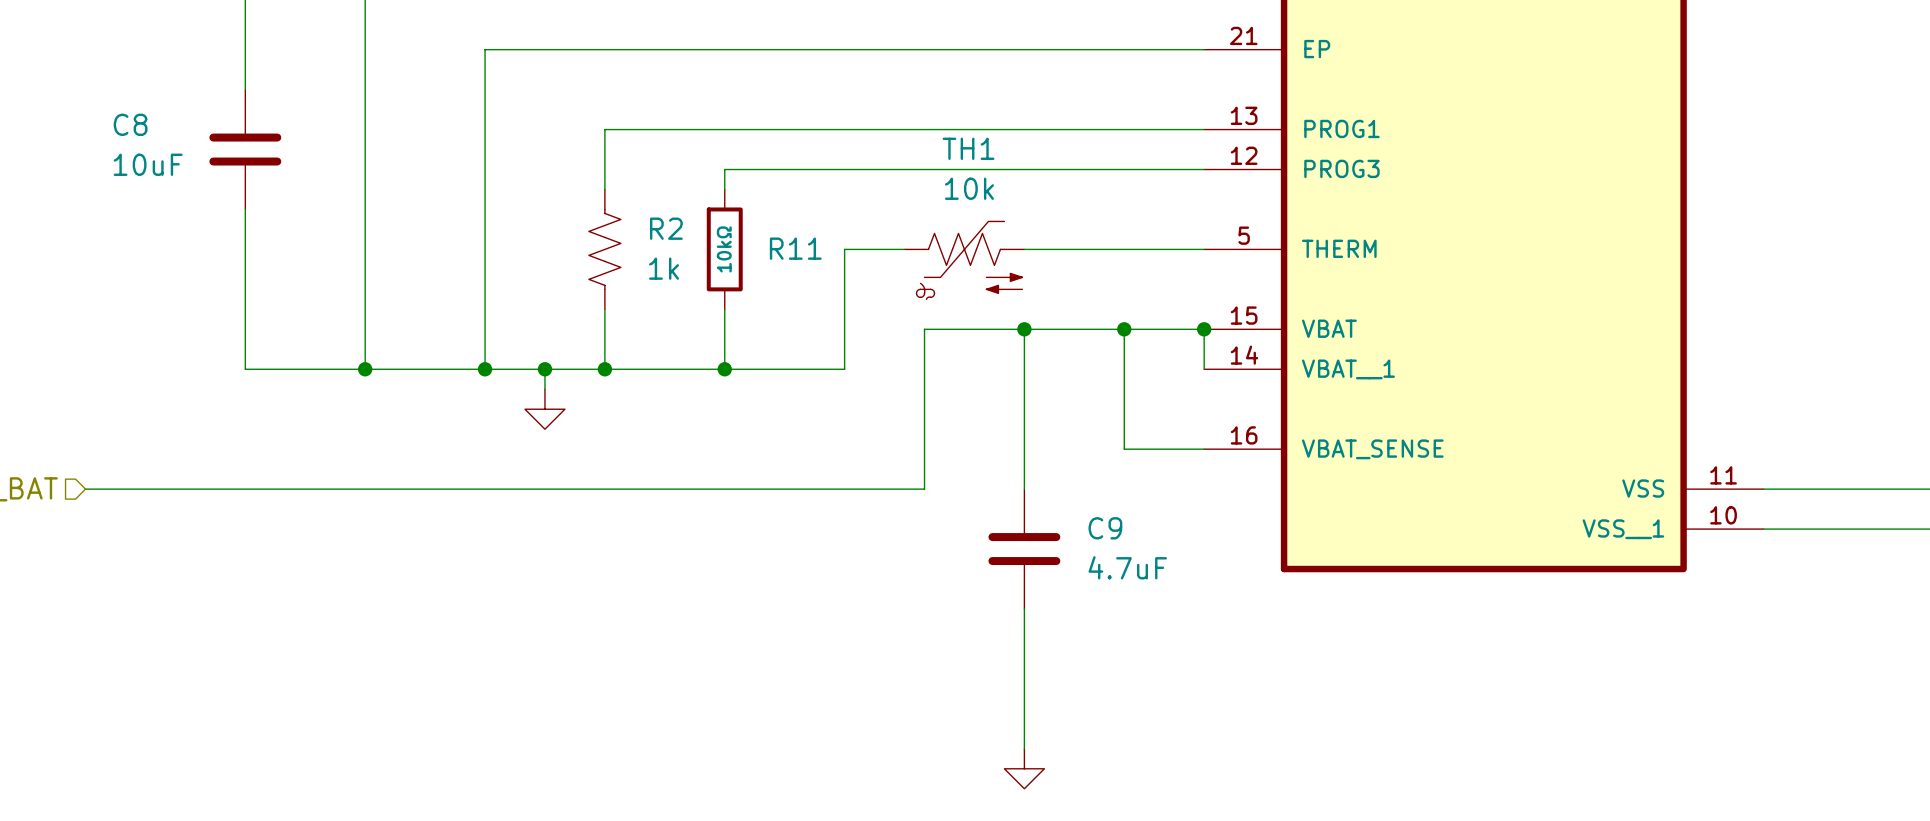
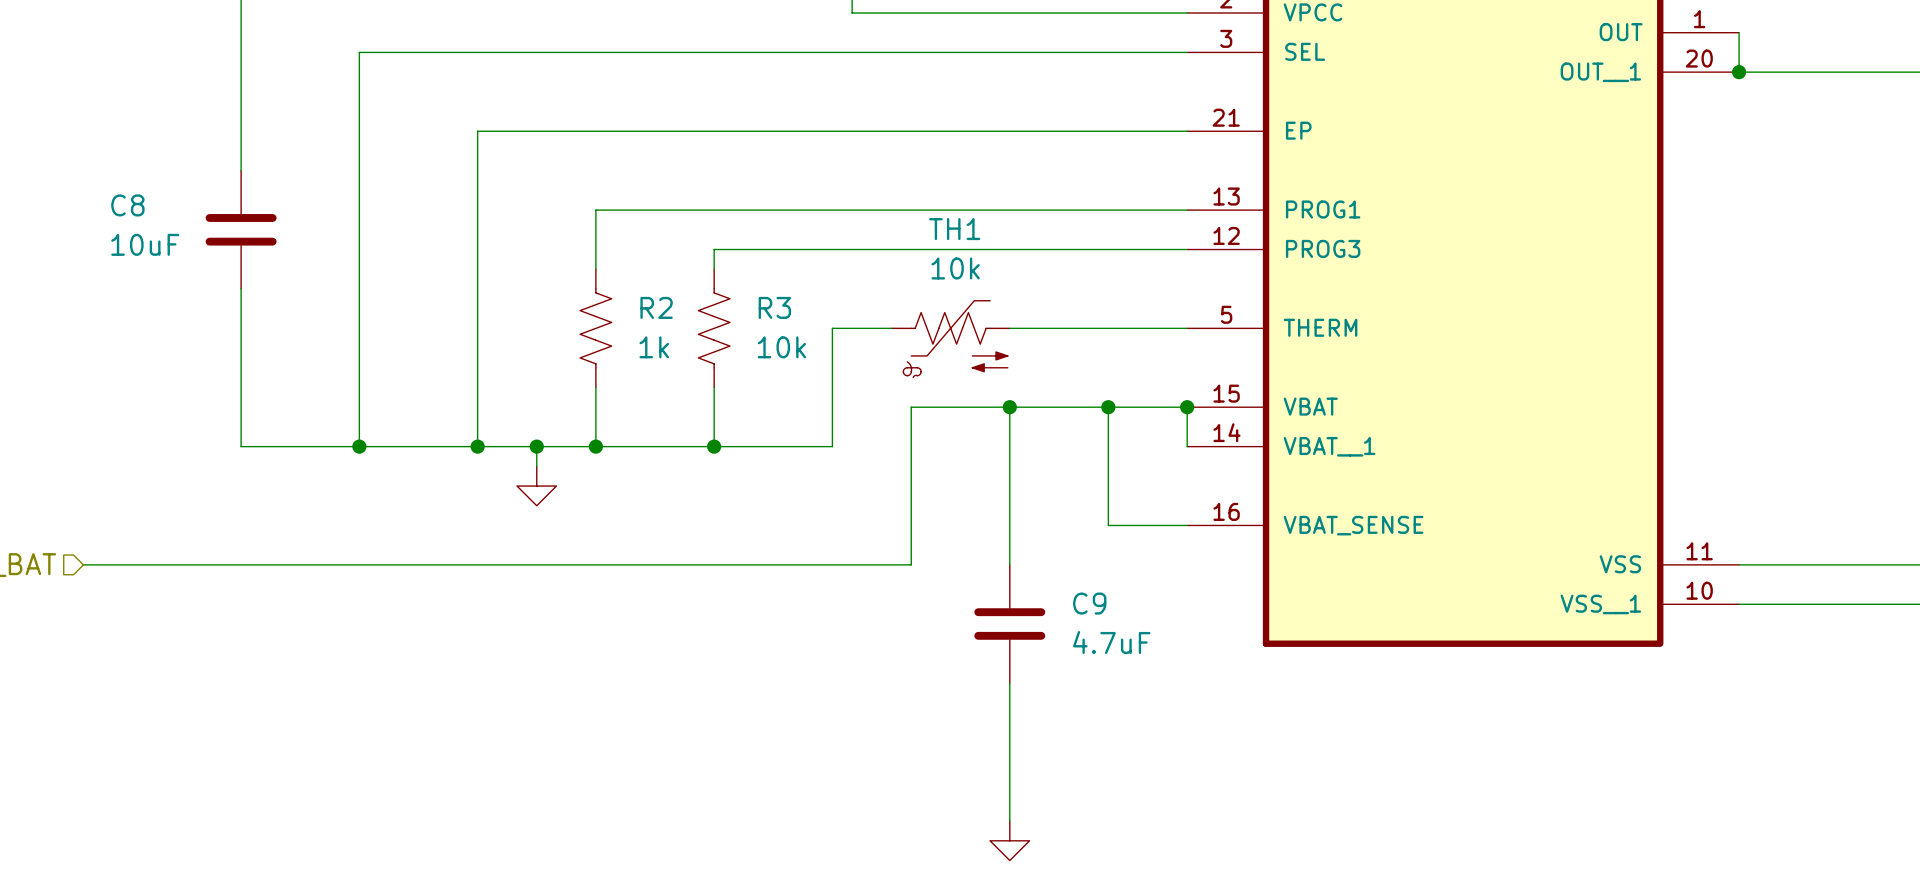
R11: 10kΩ (724, 249) -> none
R3: none -> 10k (714, 328)

